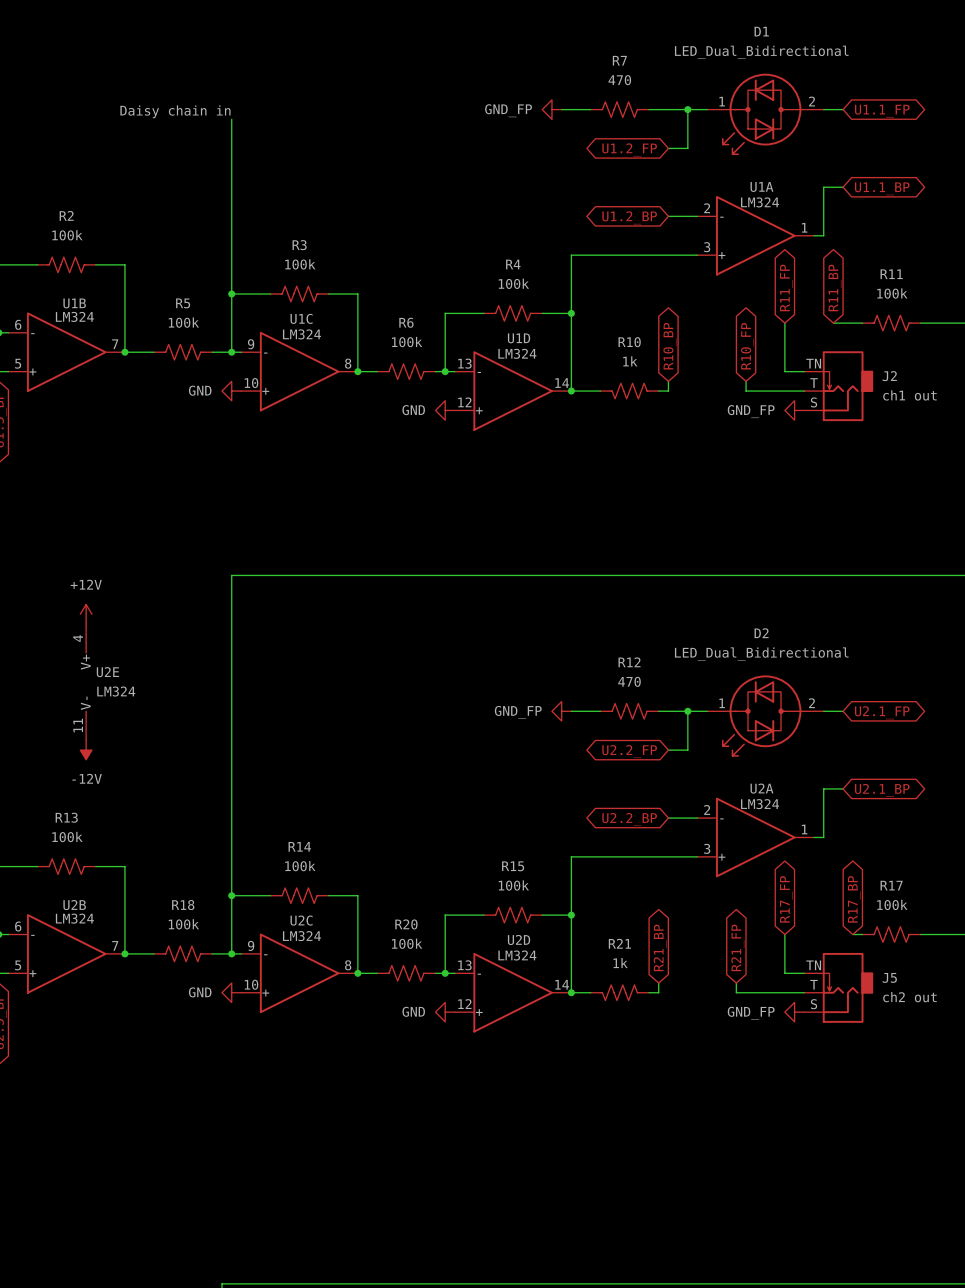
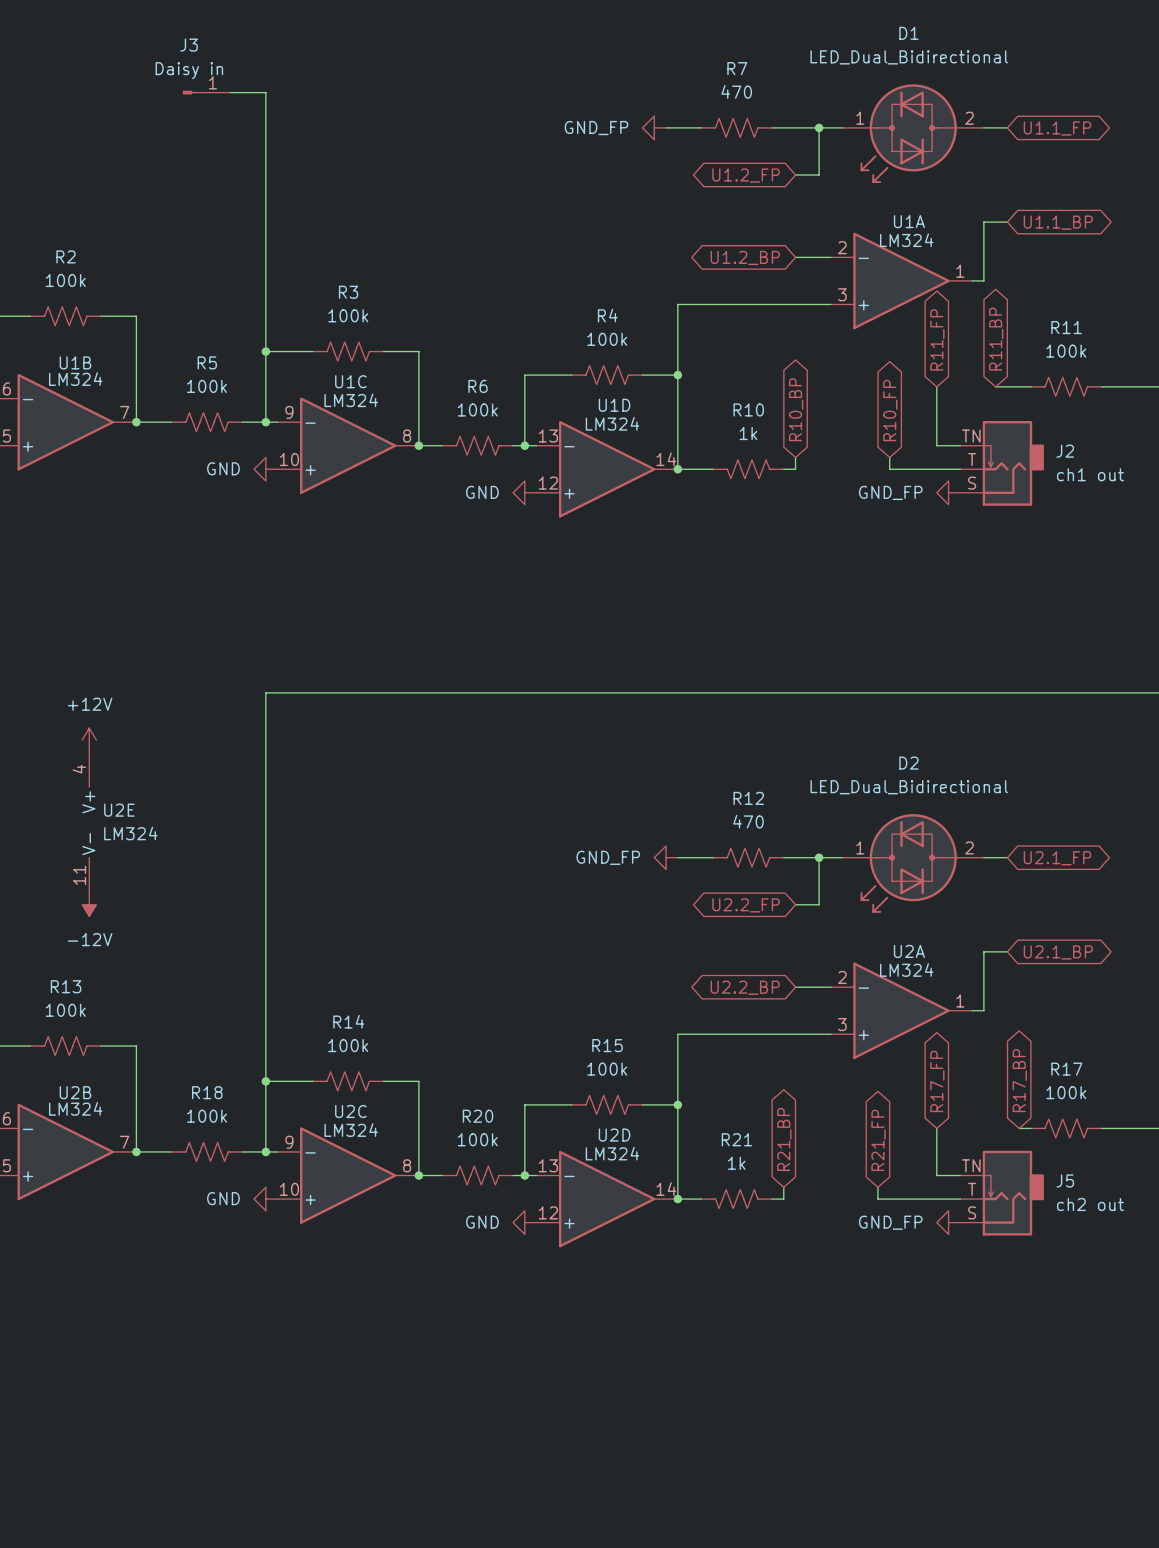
J3: none -> Daisy in (206, 92)
wire: none -> (230, 92) (265, 92) (265, 139)
label: Daisy chain in (175, 111) -> none

